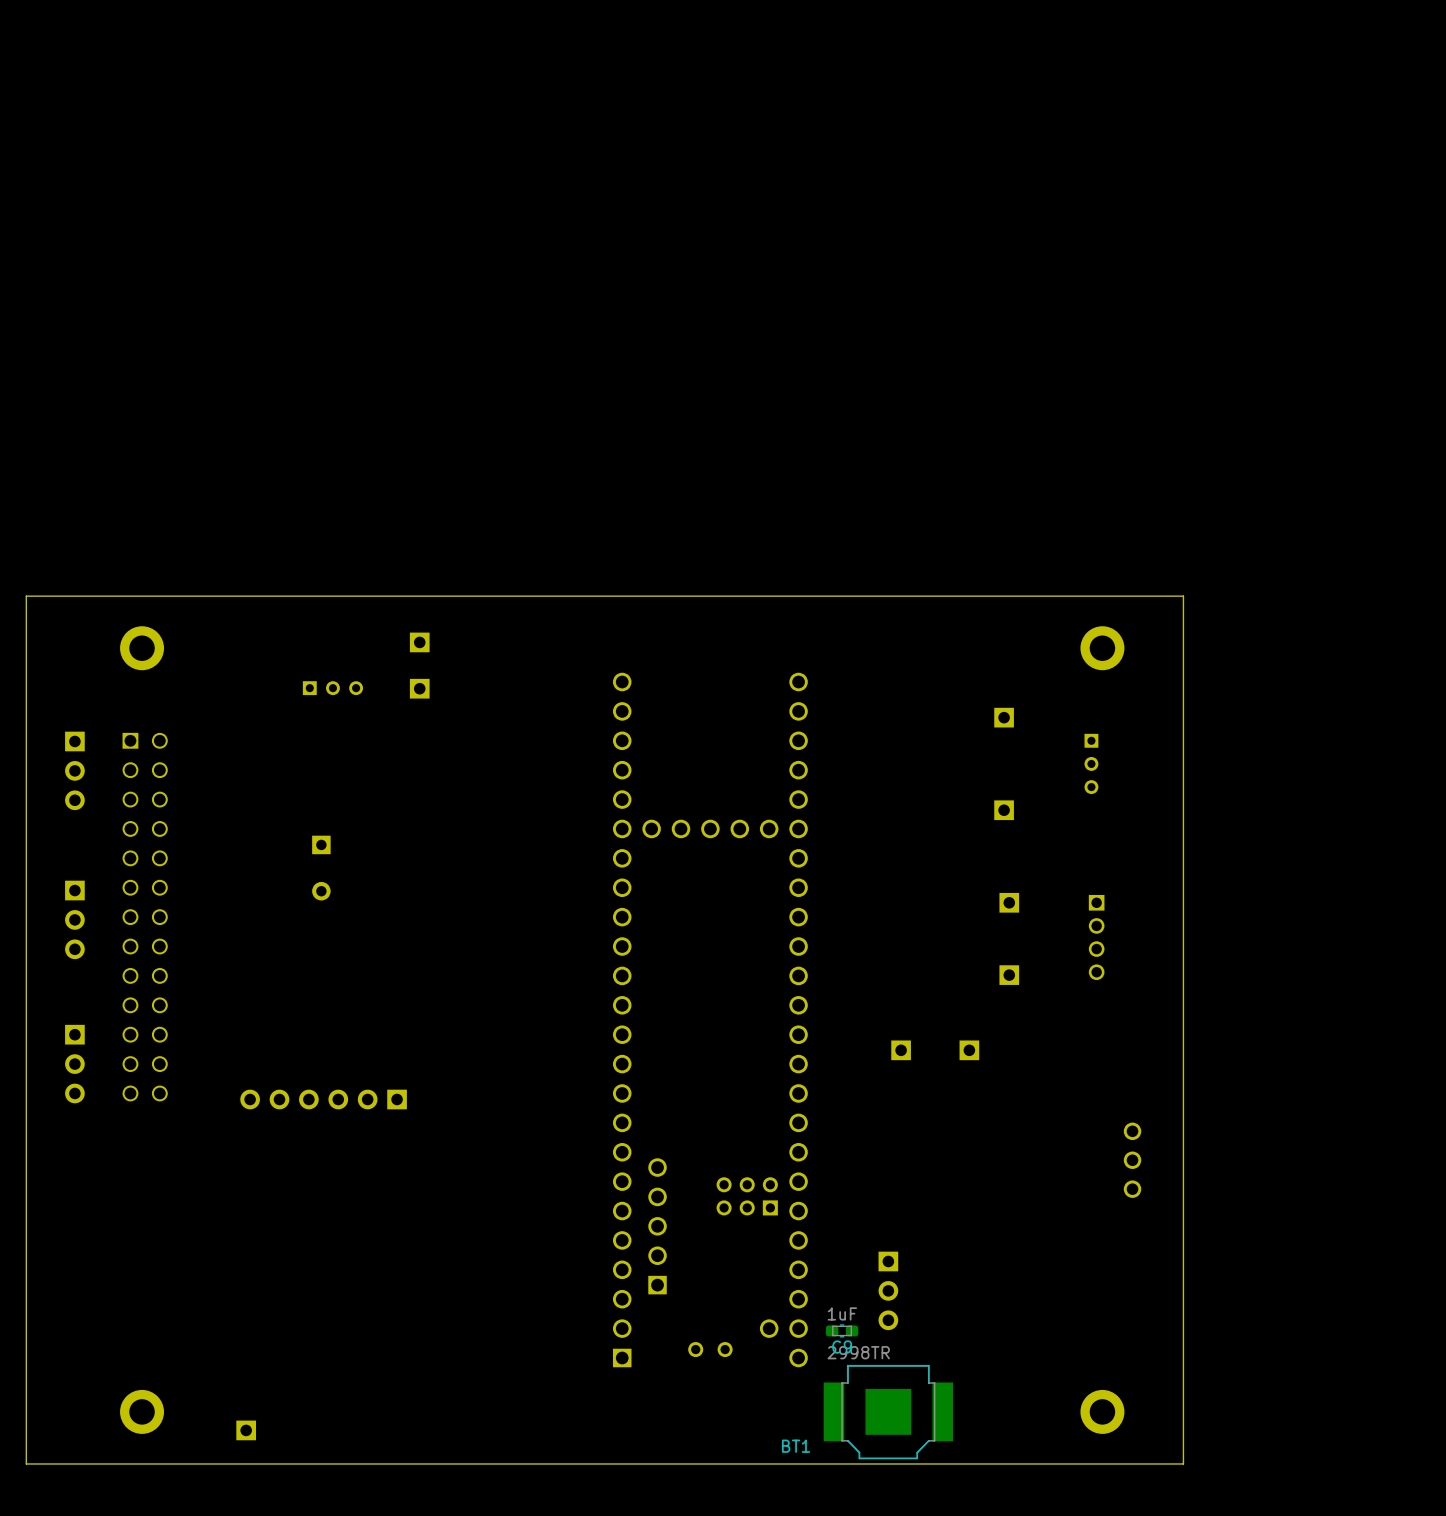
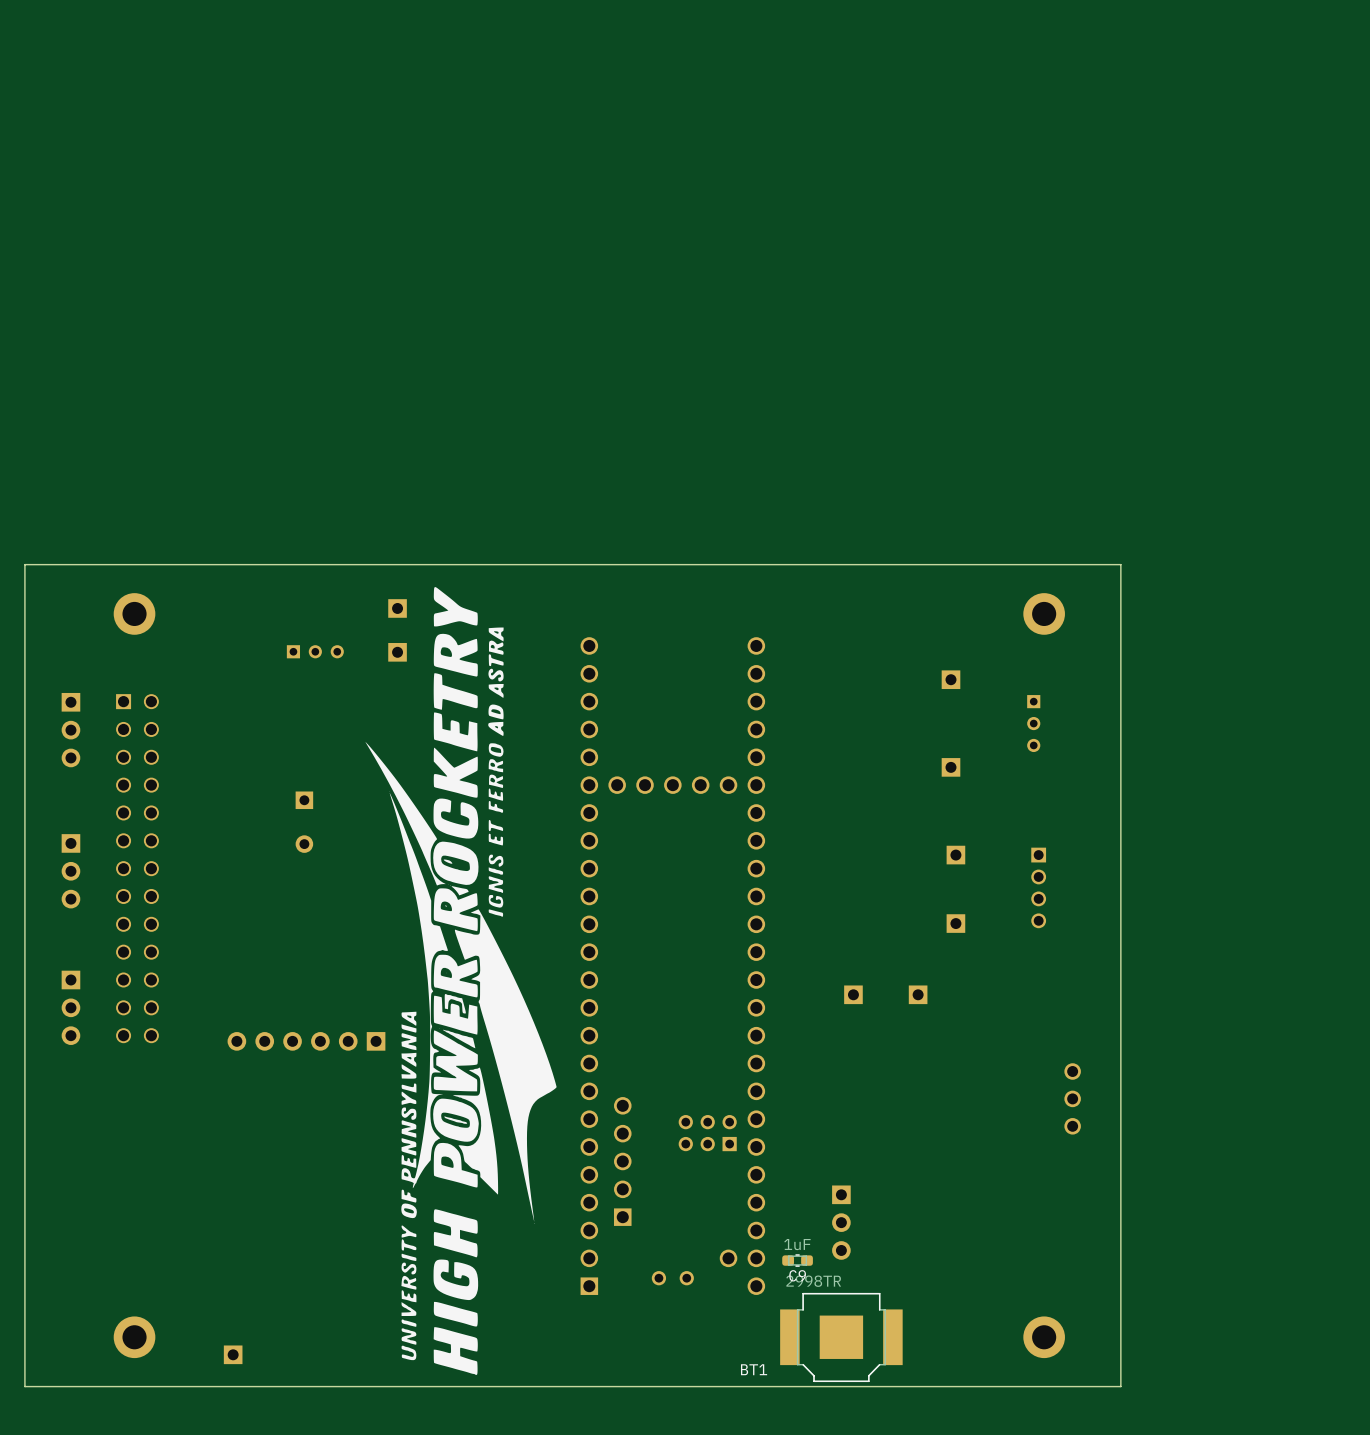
drawing: none -> [365, 587, 557, 1375]

